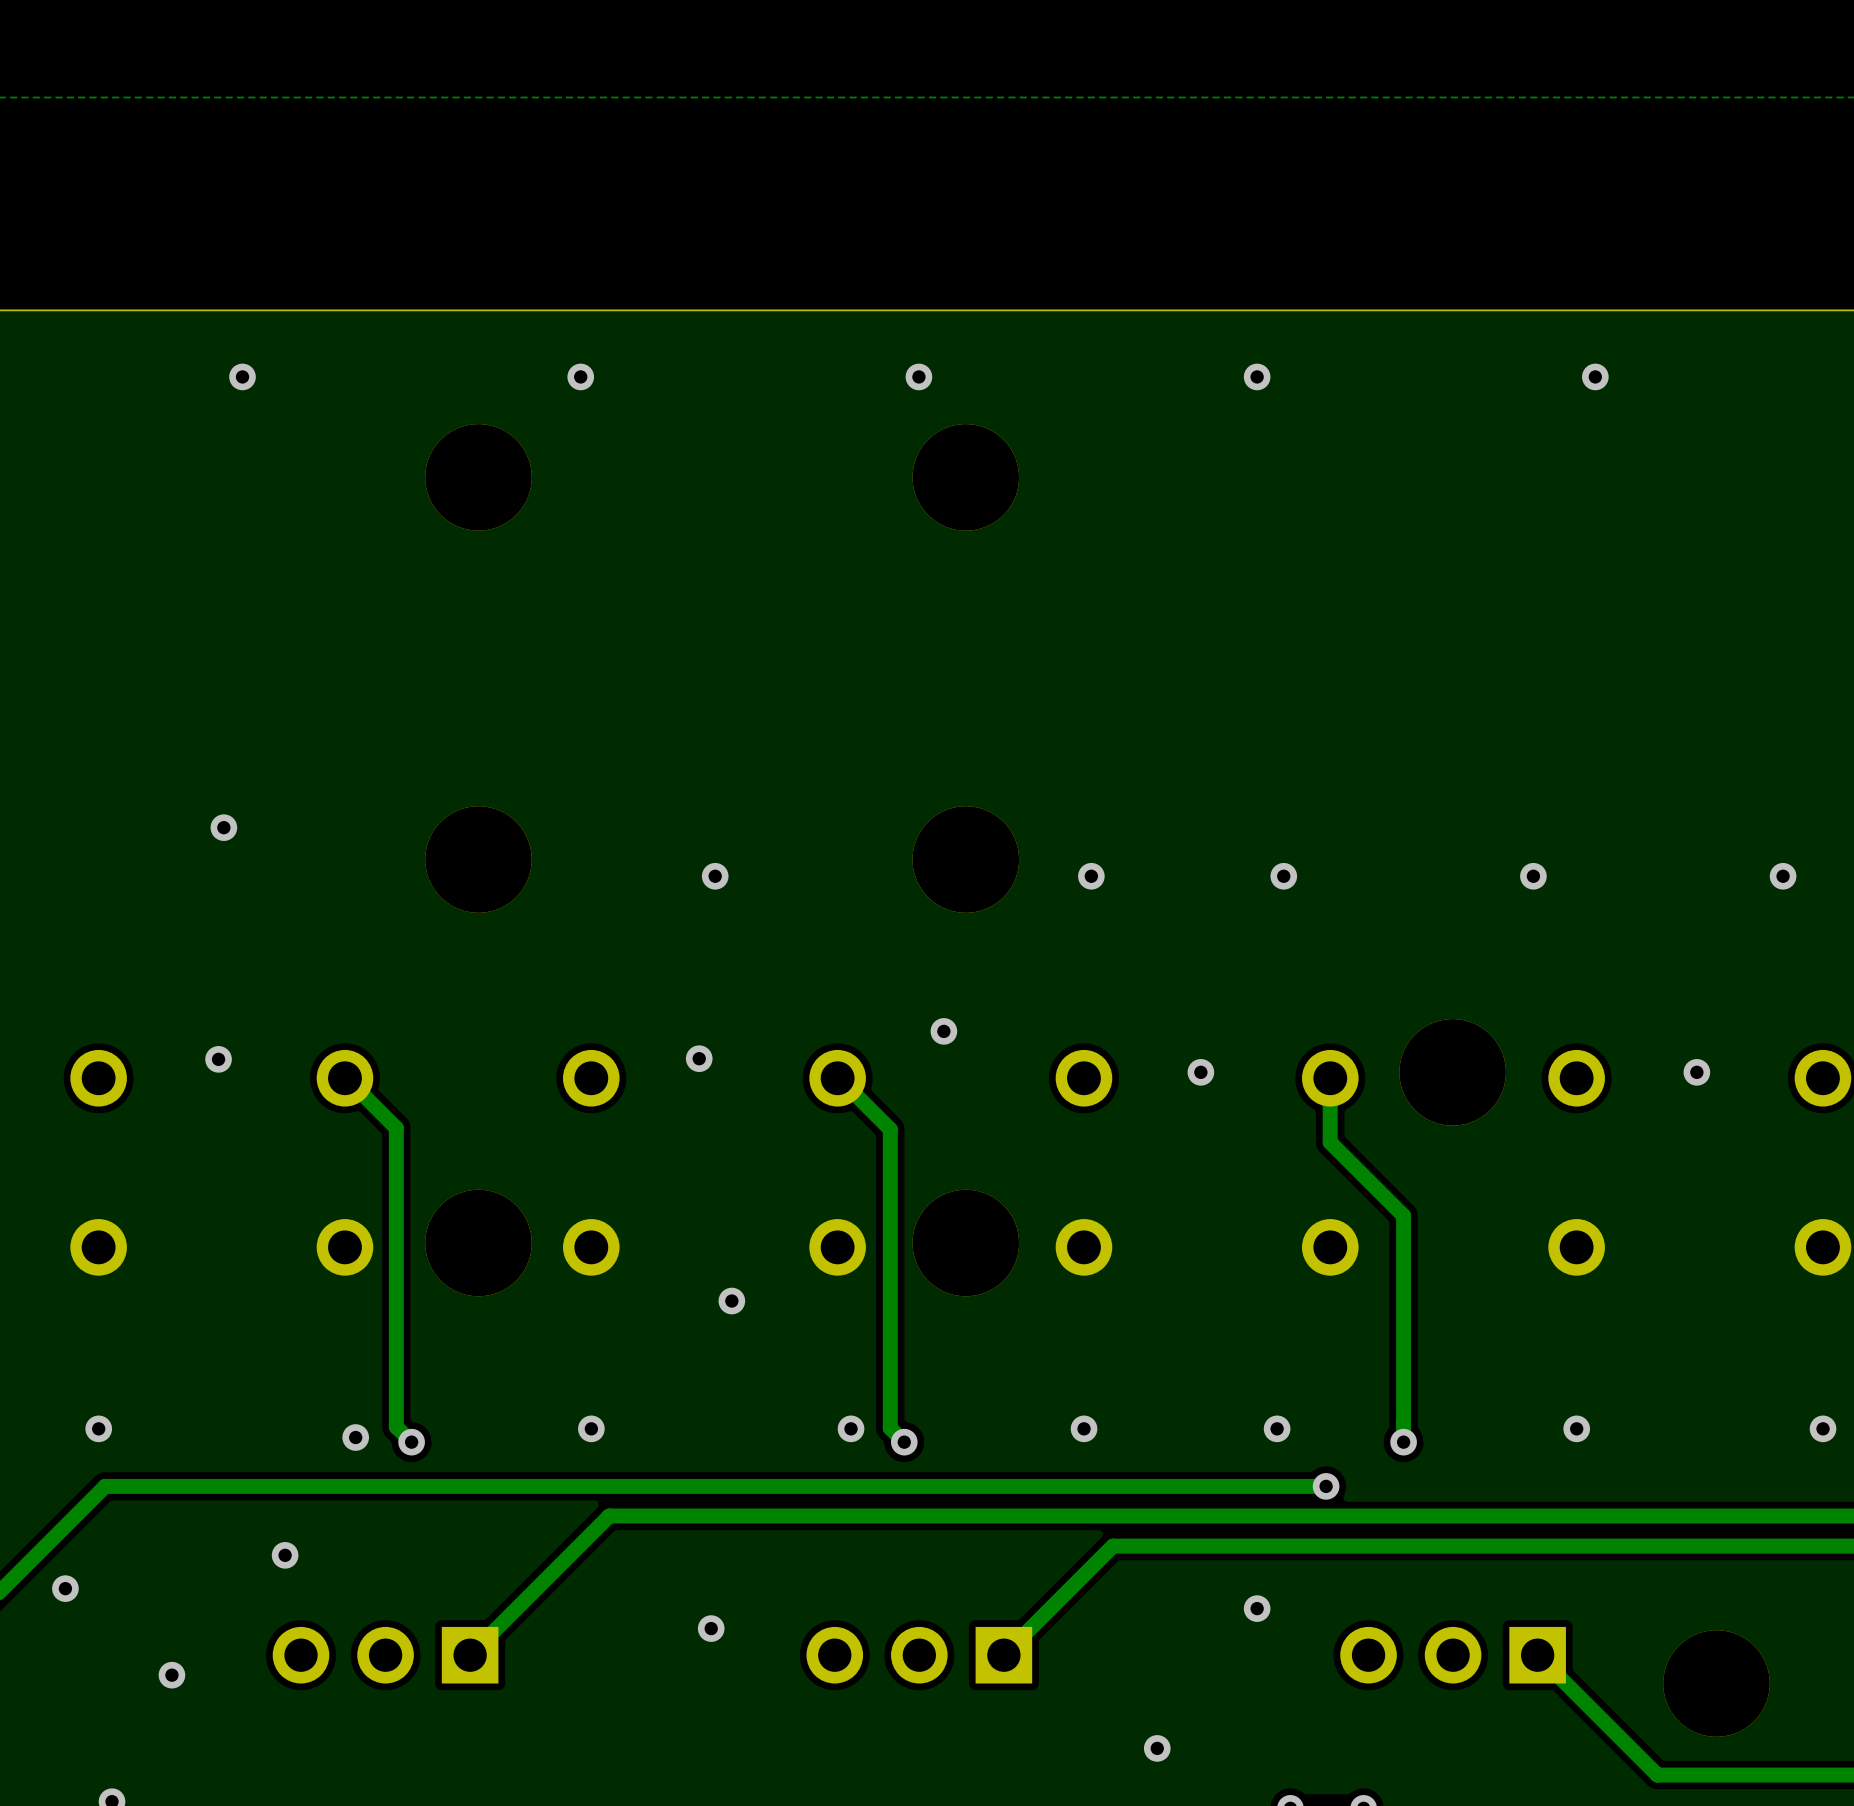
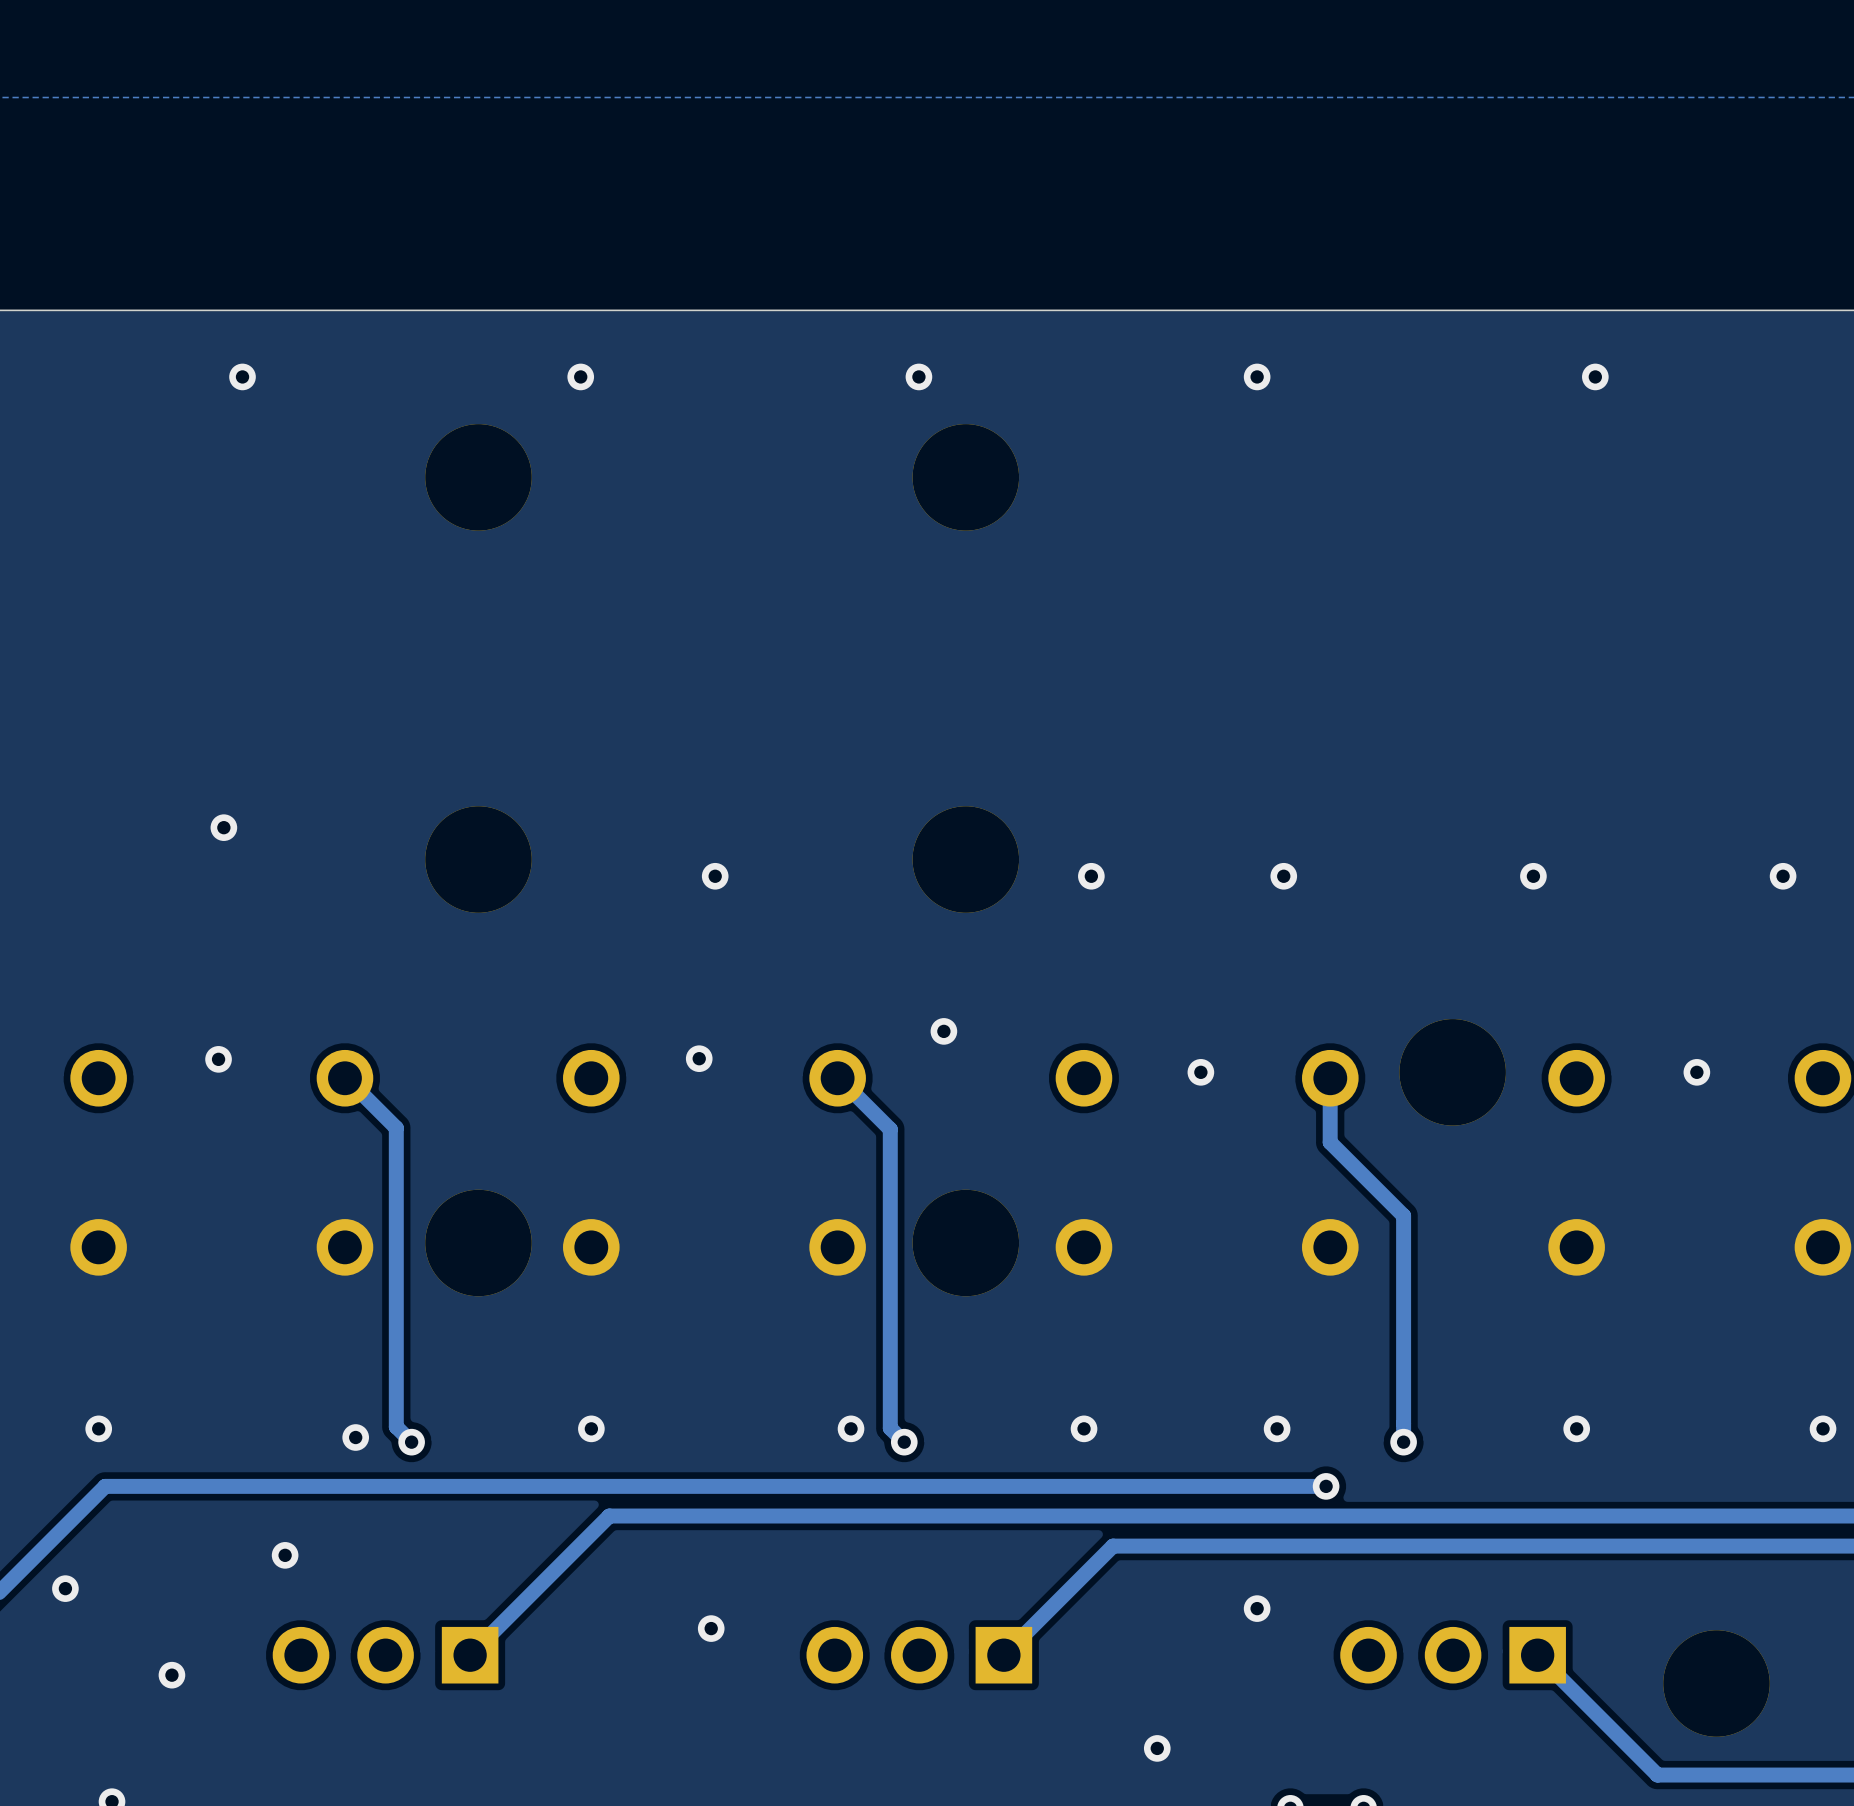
via: (731, 1301) -> none

